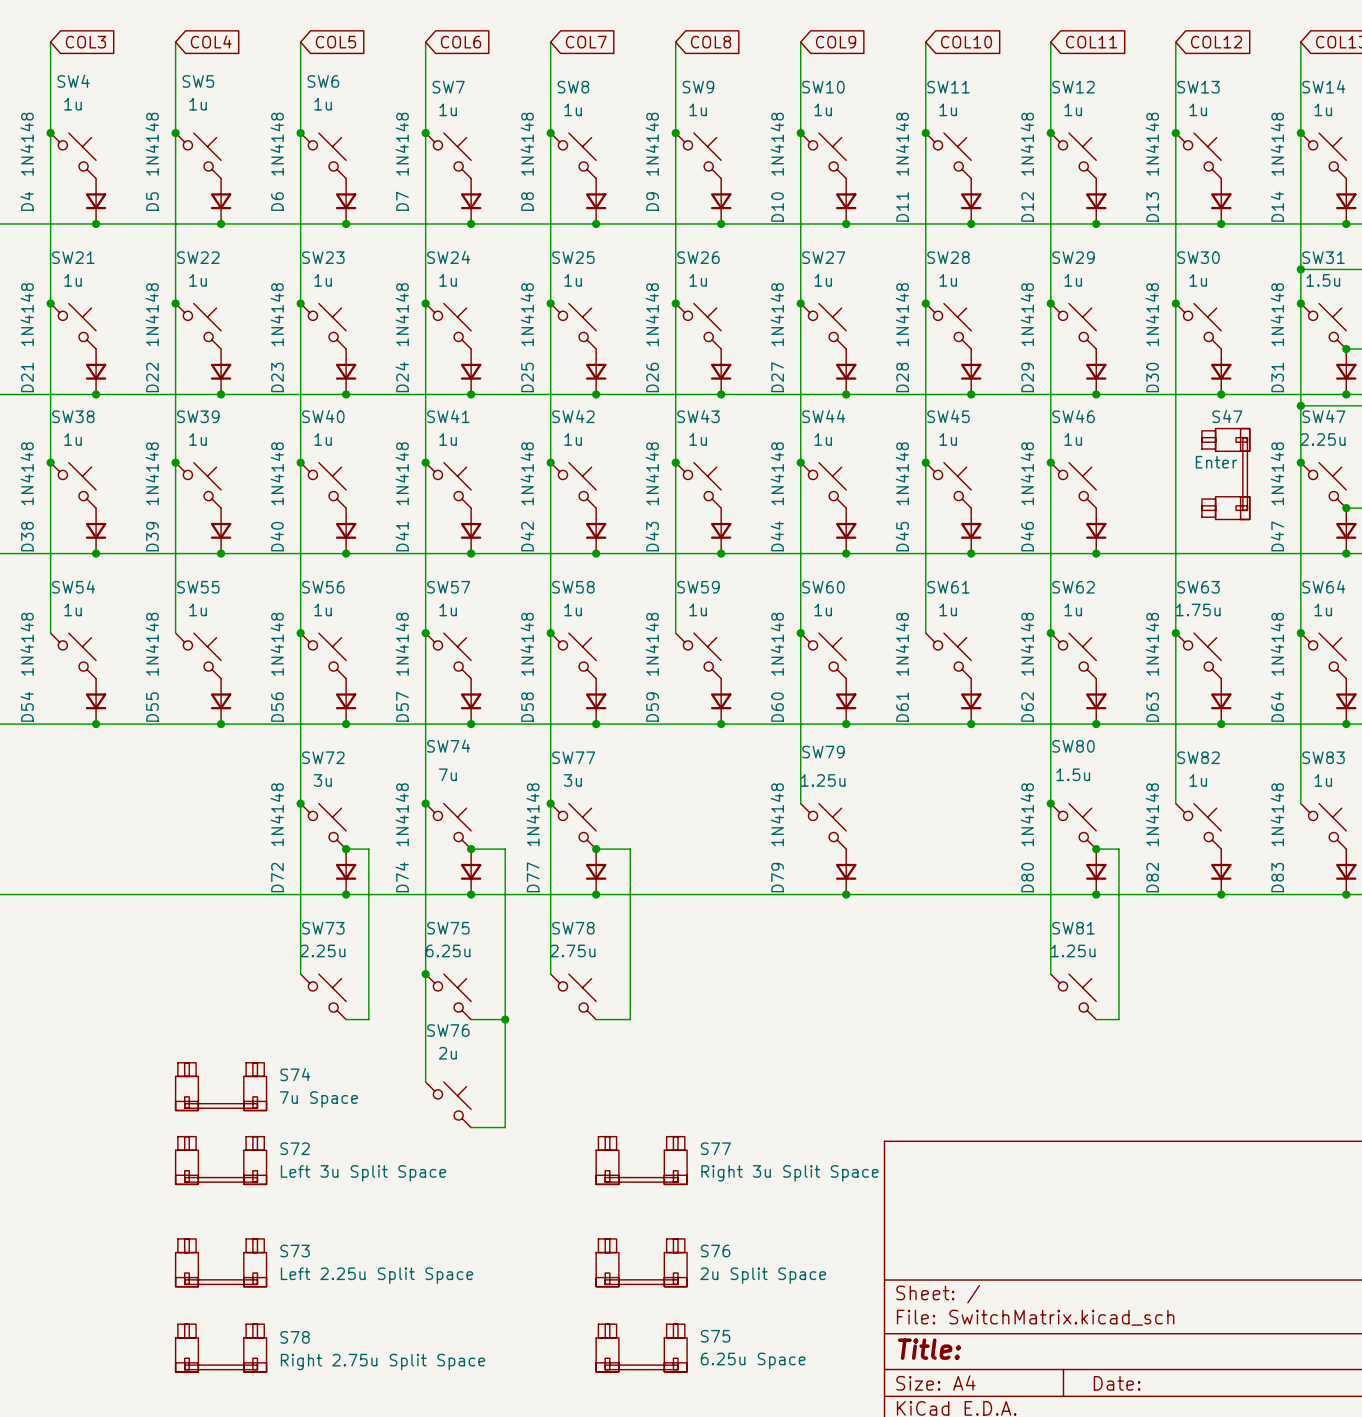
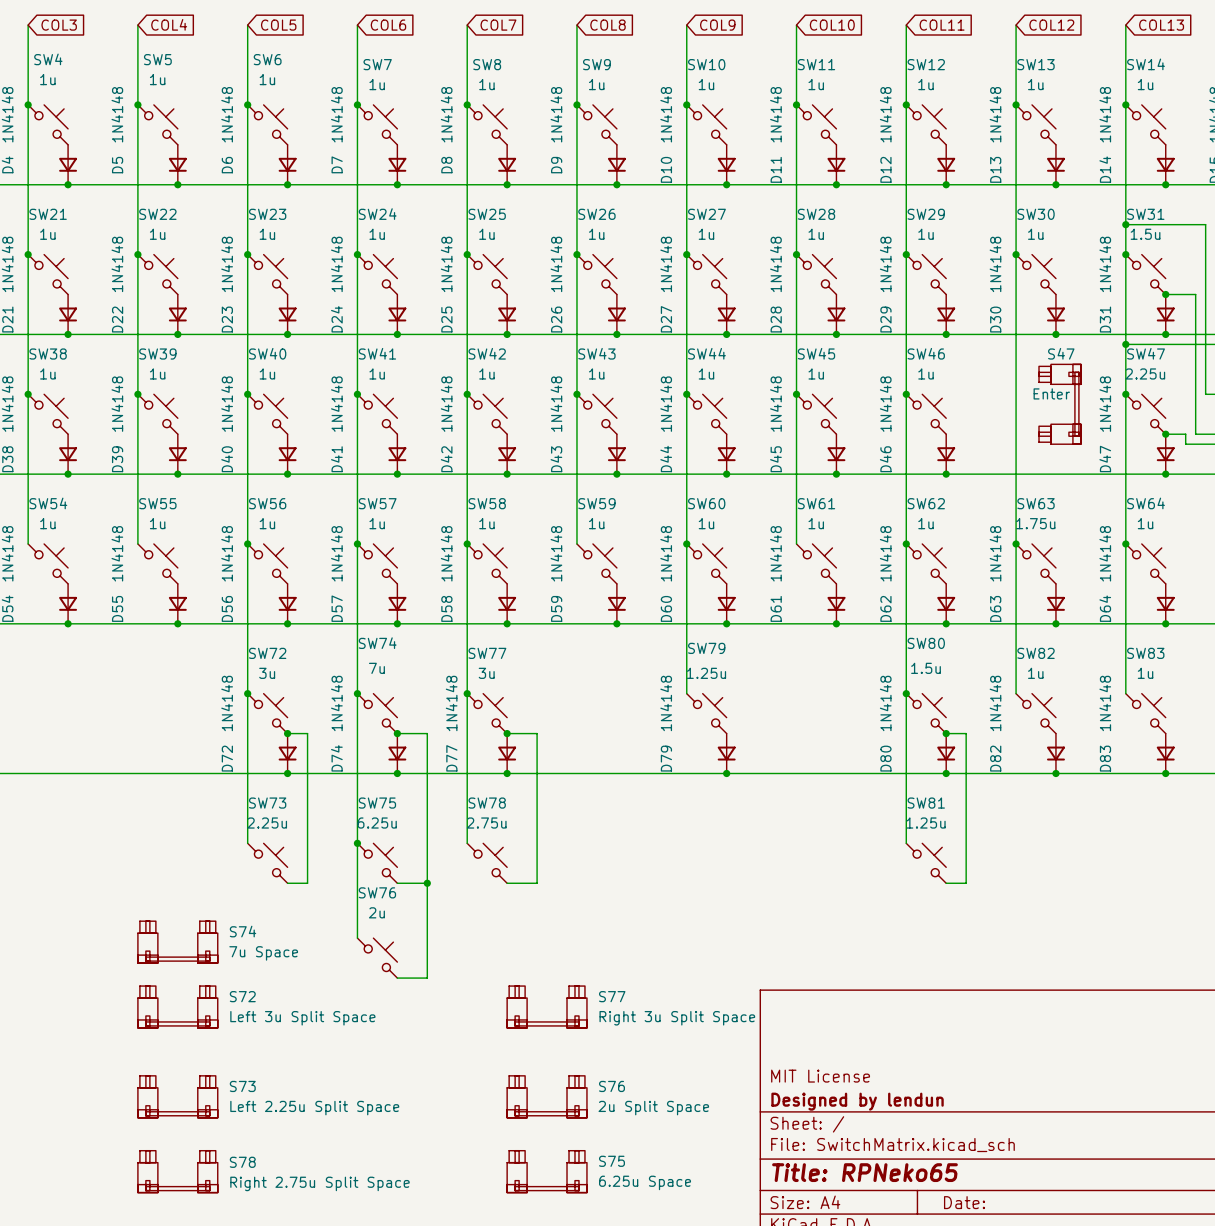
title block: none -> MIT License (820, 1076)
title block: none -> Designed by lendun (857, 1101)
title block: Title: (929, 1349) -> Title: RPNeko65 (864, 1172)

